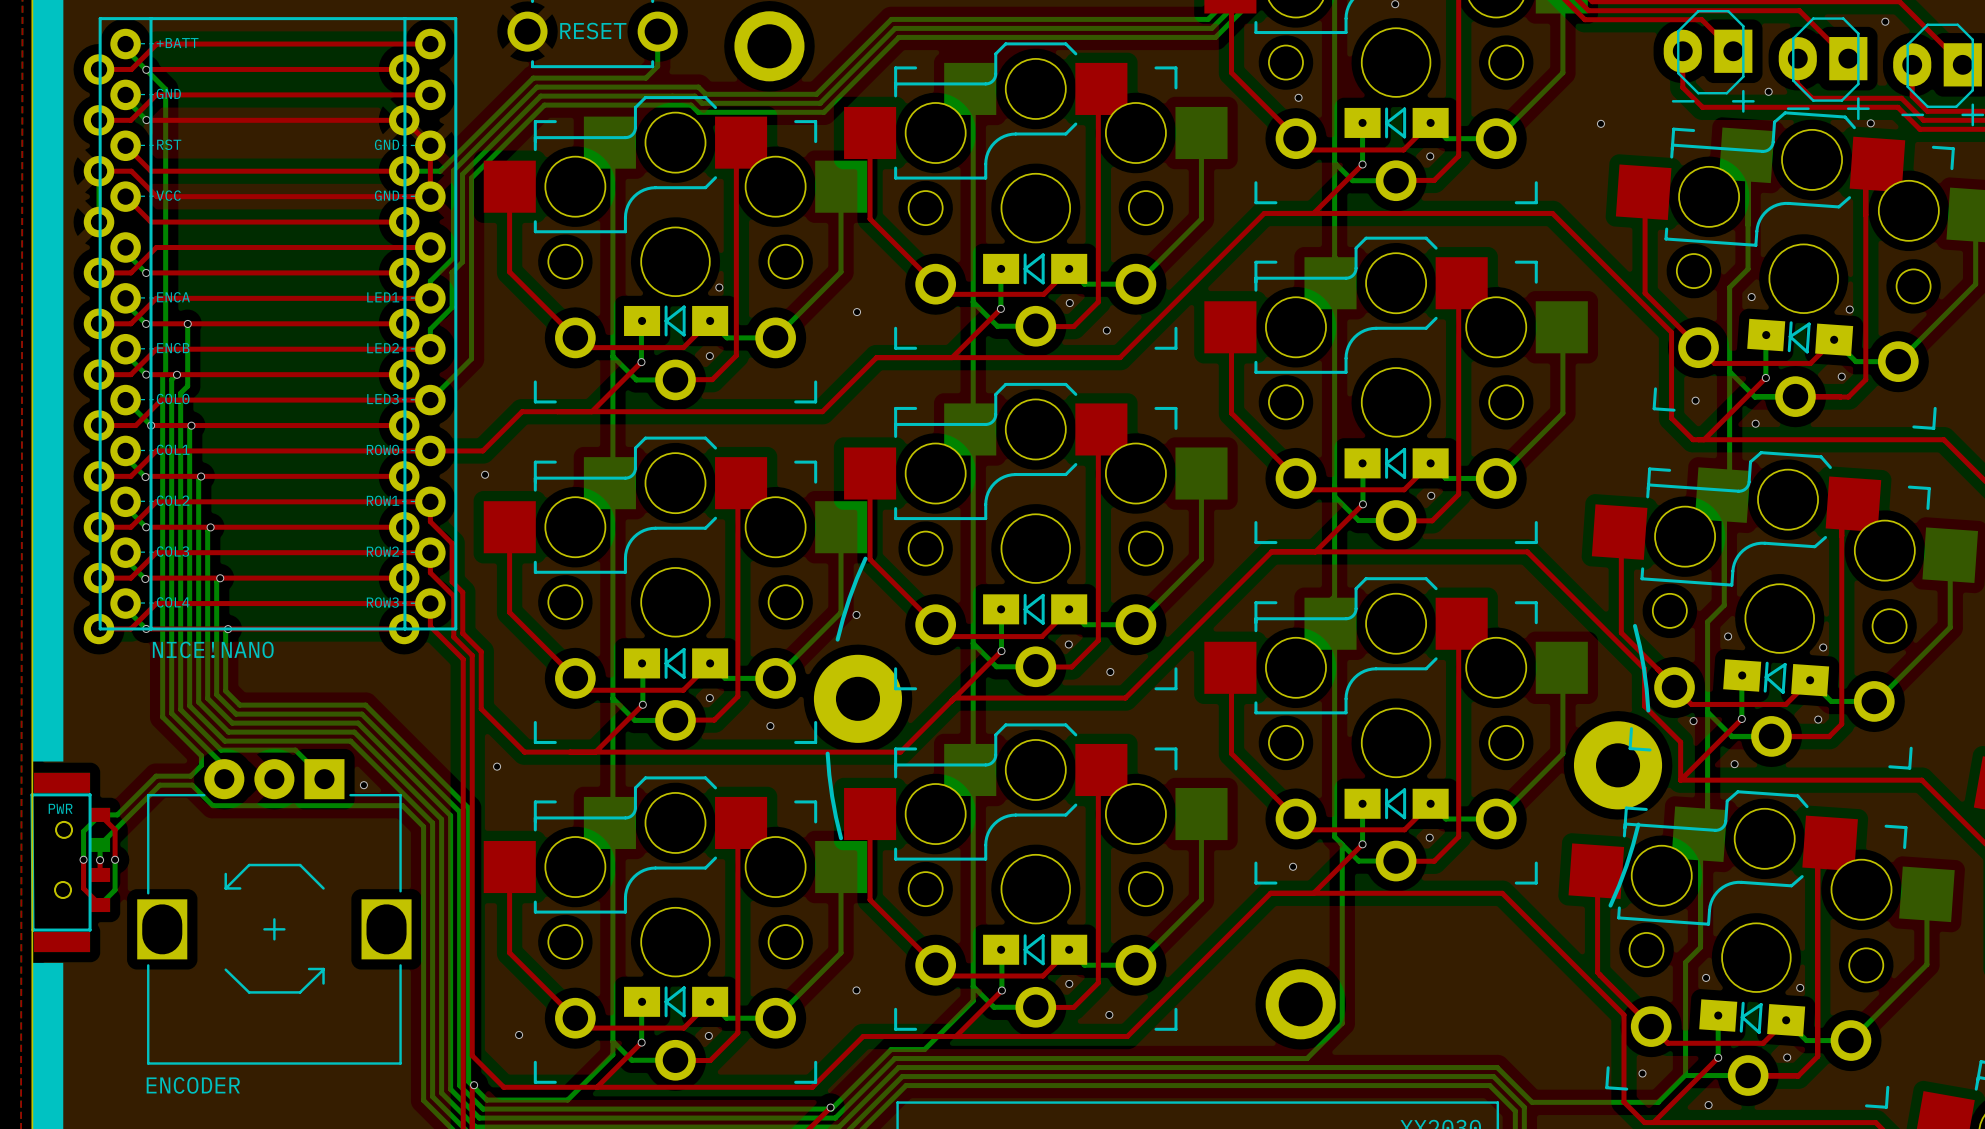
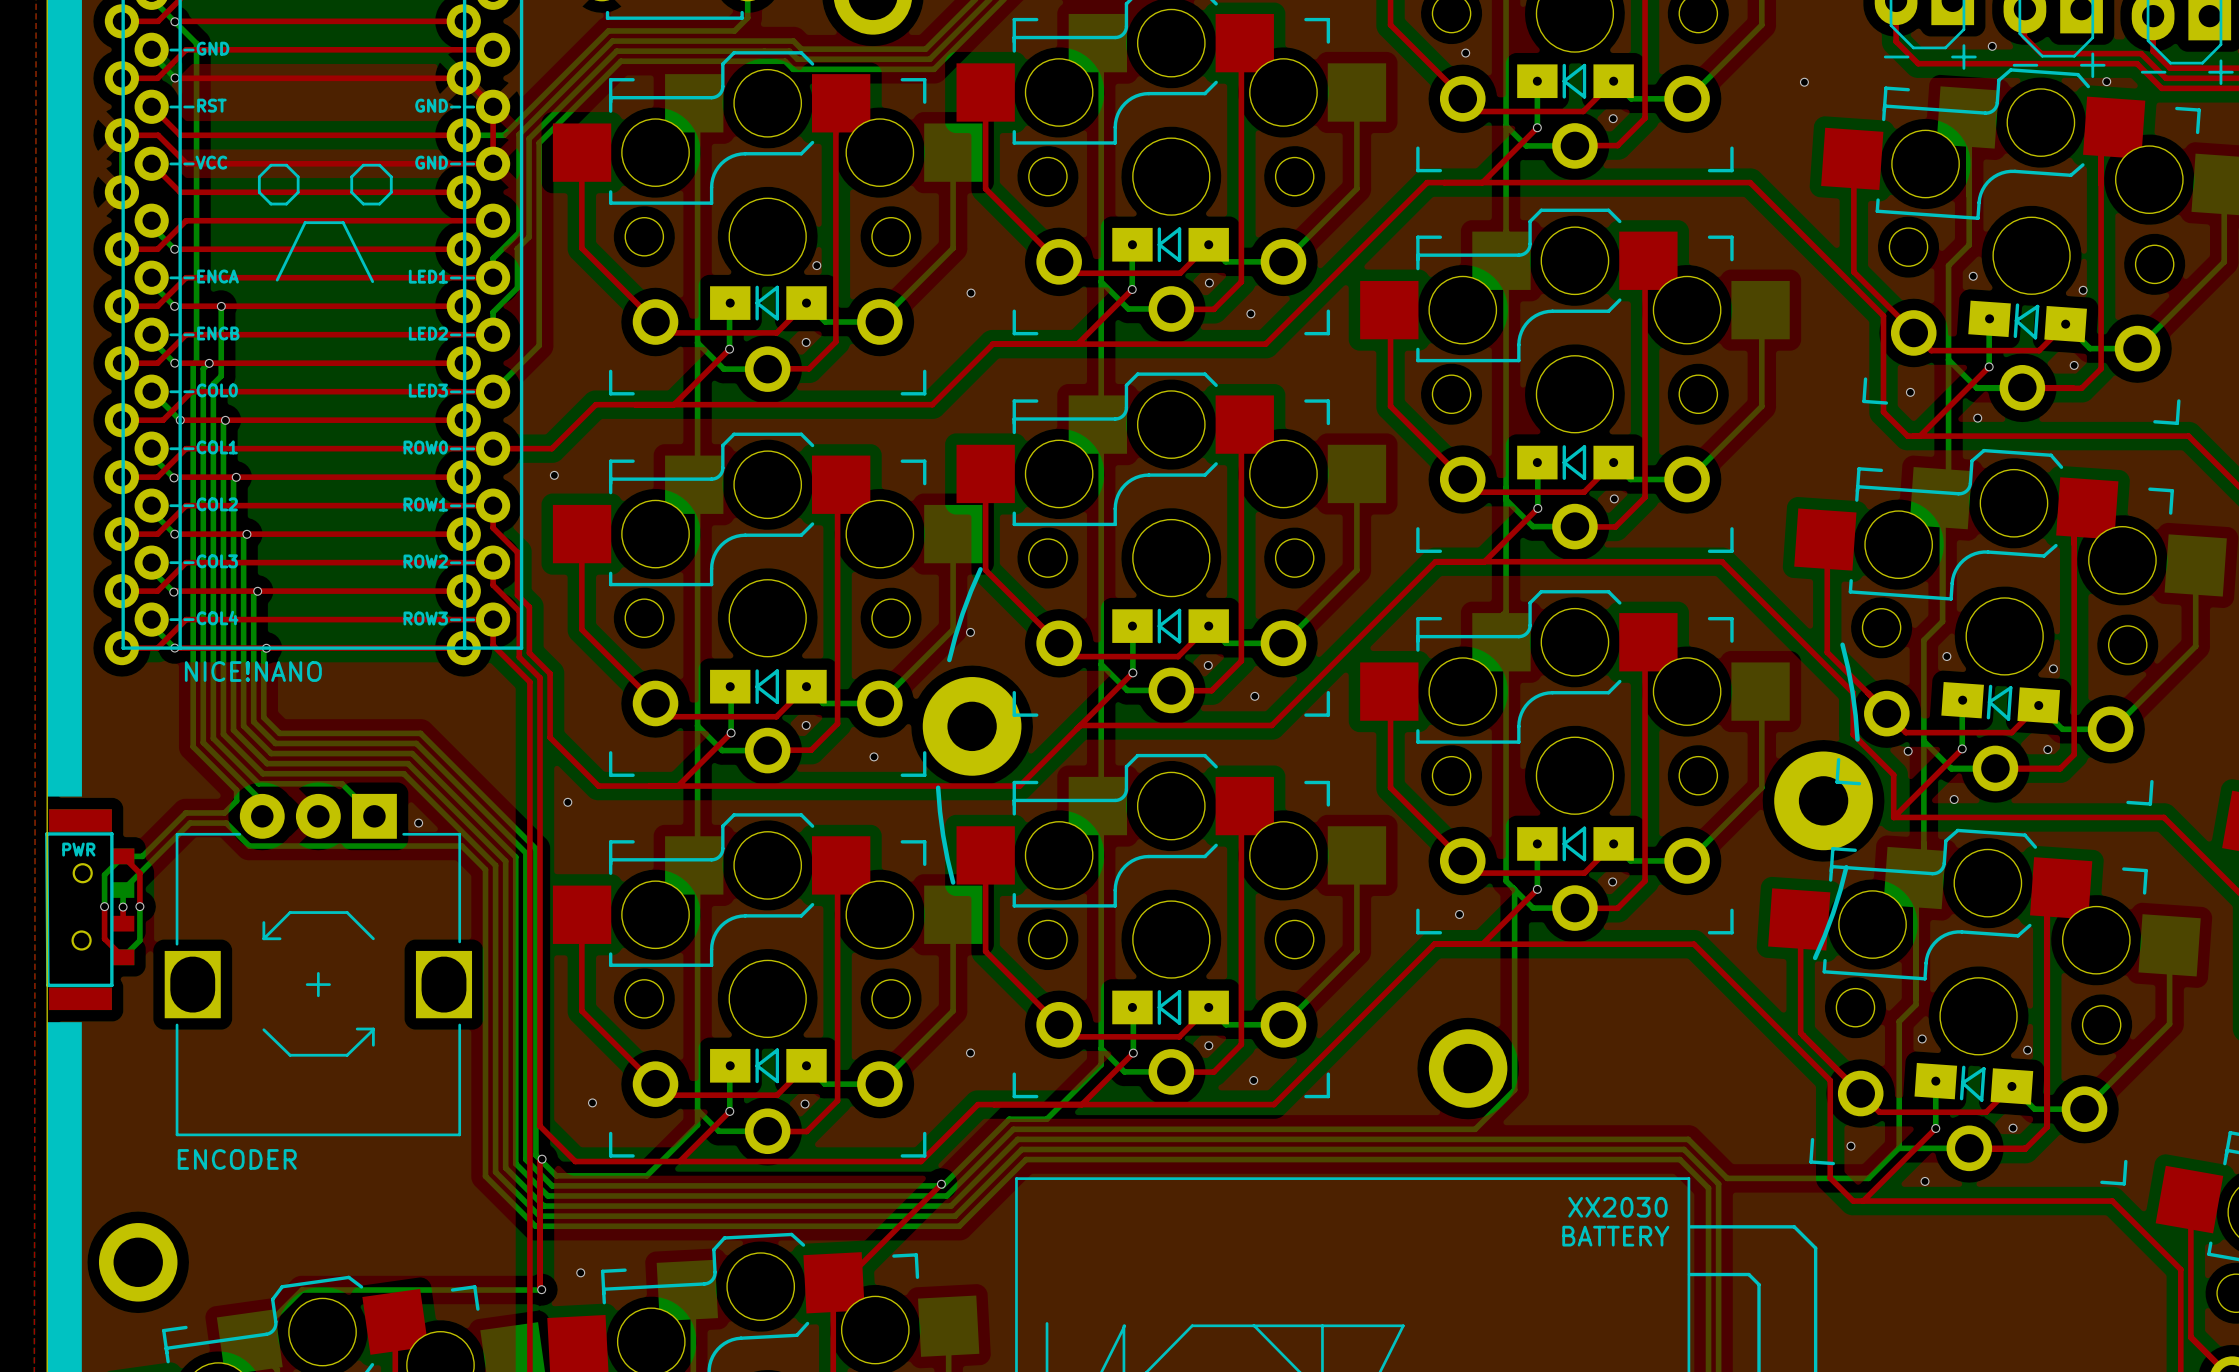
line: none -> (270, 165) (286, 165) (298, 176) (298, 192) (286, 204) (270, 204) (259, 192) (259, 176) (270, 165)
line: none -> (363, 165) (379, 165) (391, 176) (391, 192) (379, 204) (363, 204) (351, 192) (351, 176) (363, 165)
line: none -> (277, 280) (305, 222) (343, 222) (372, 281)

